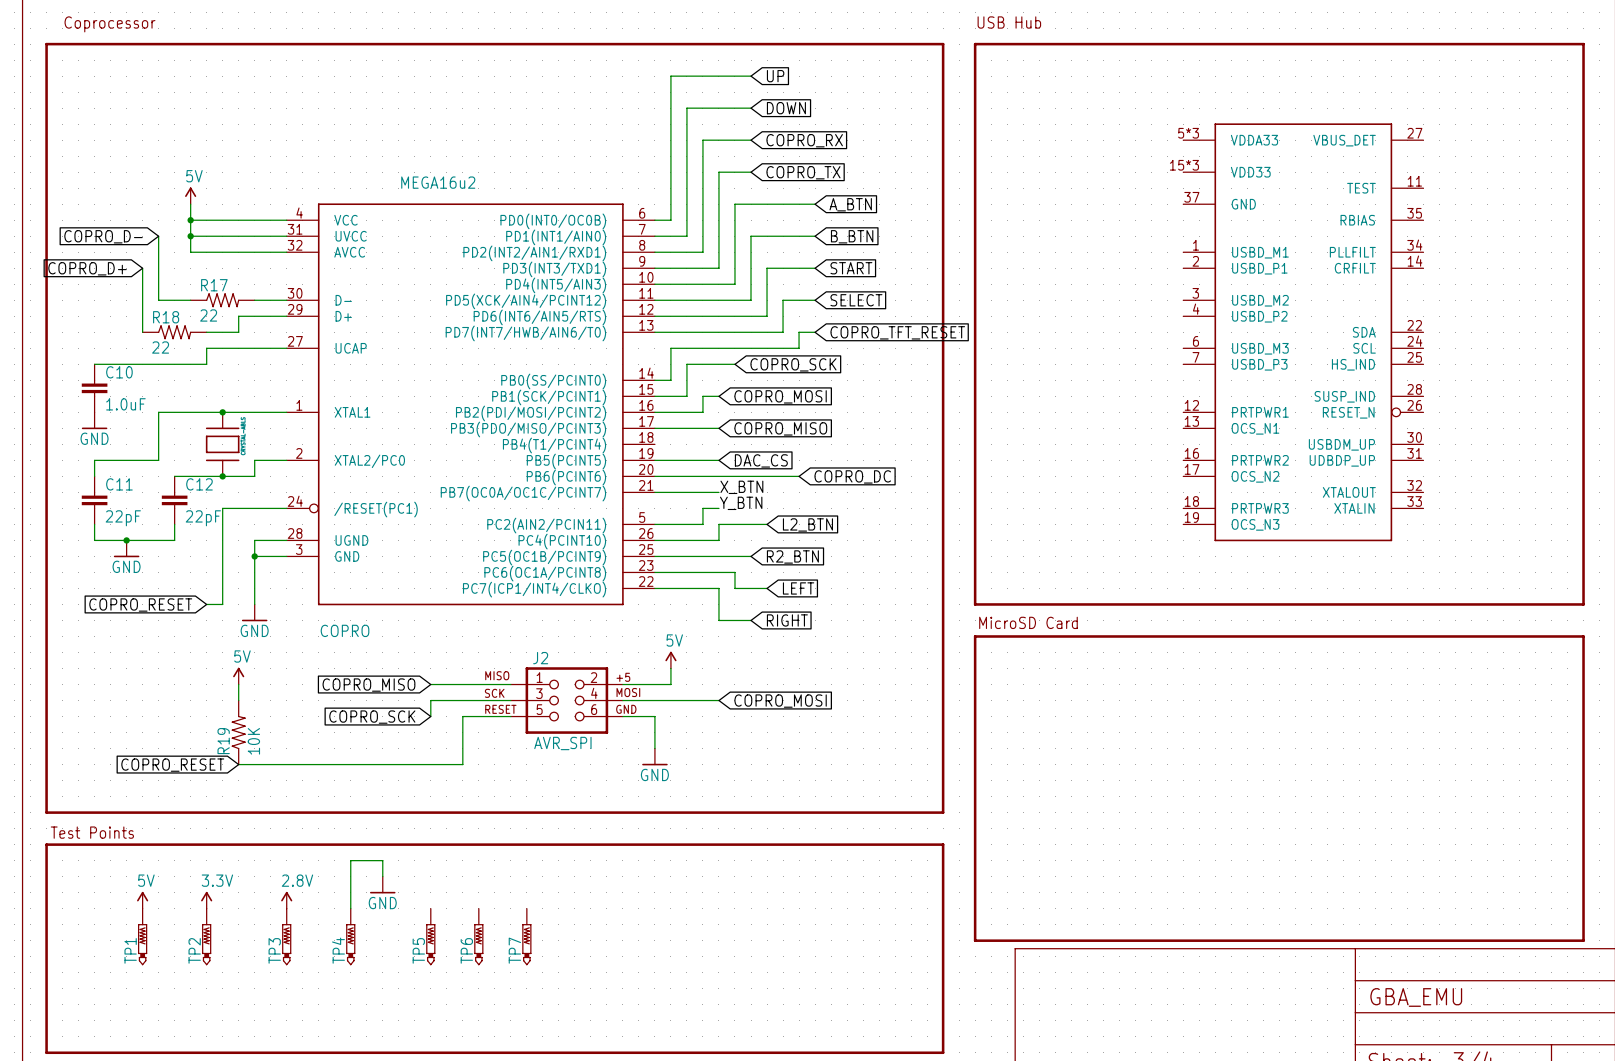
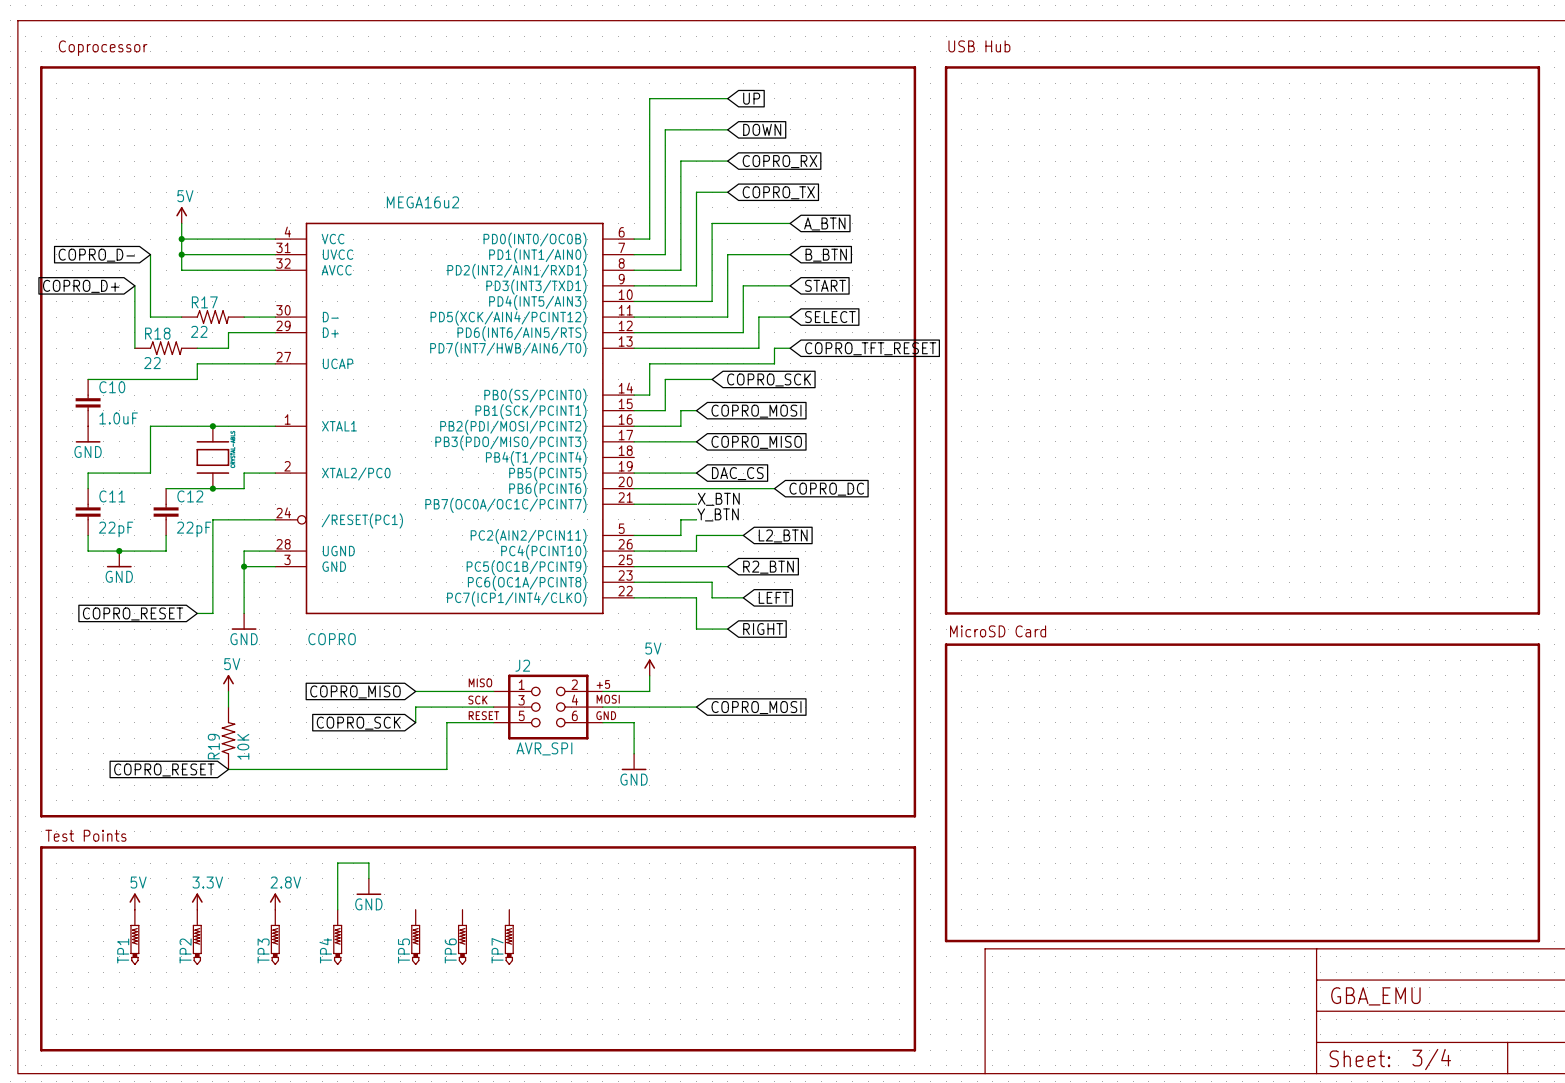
part: (1303, 332) -> none

